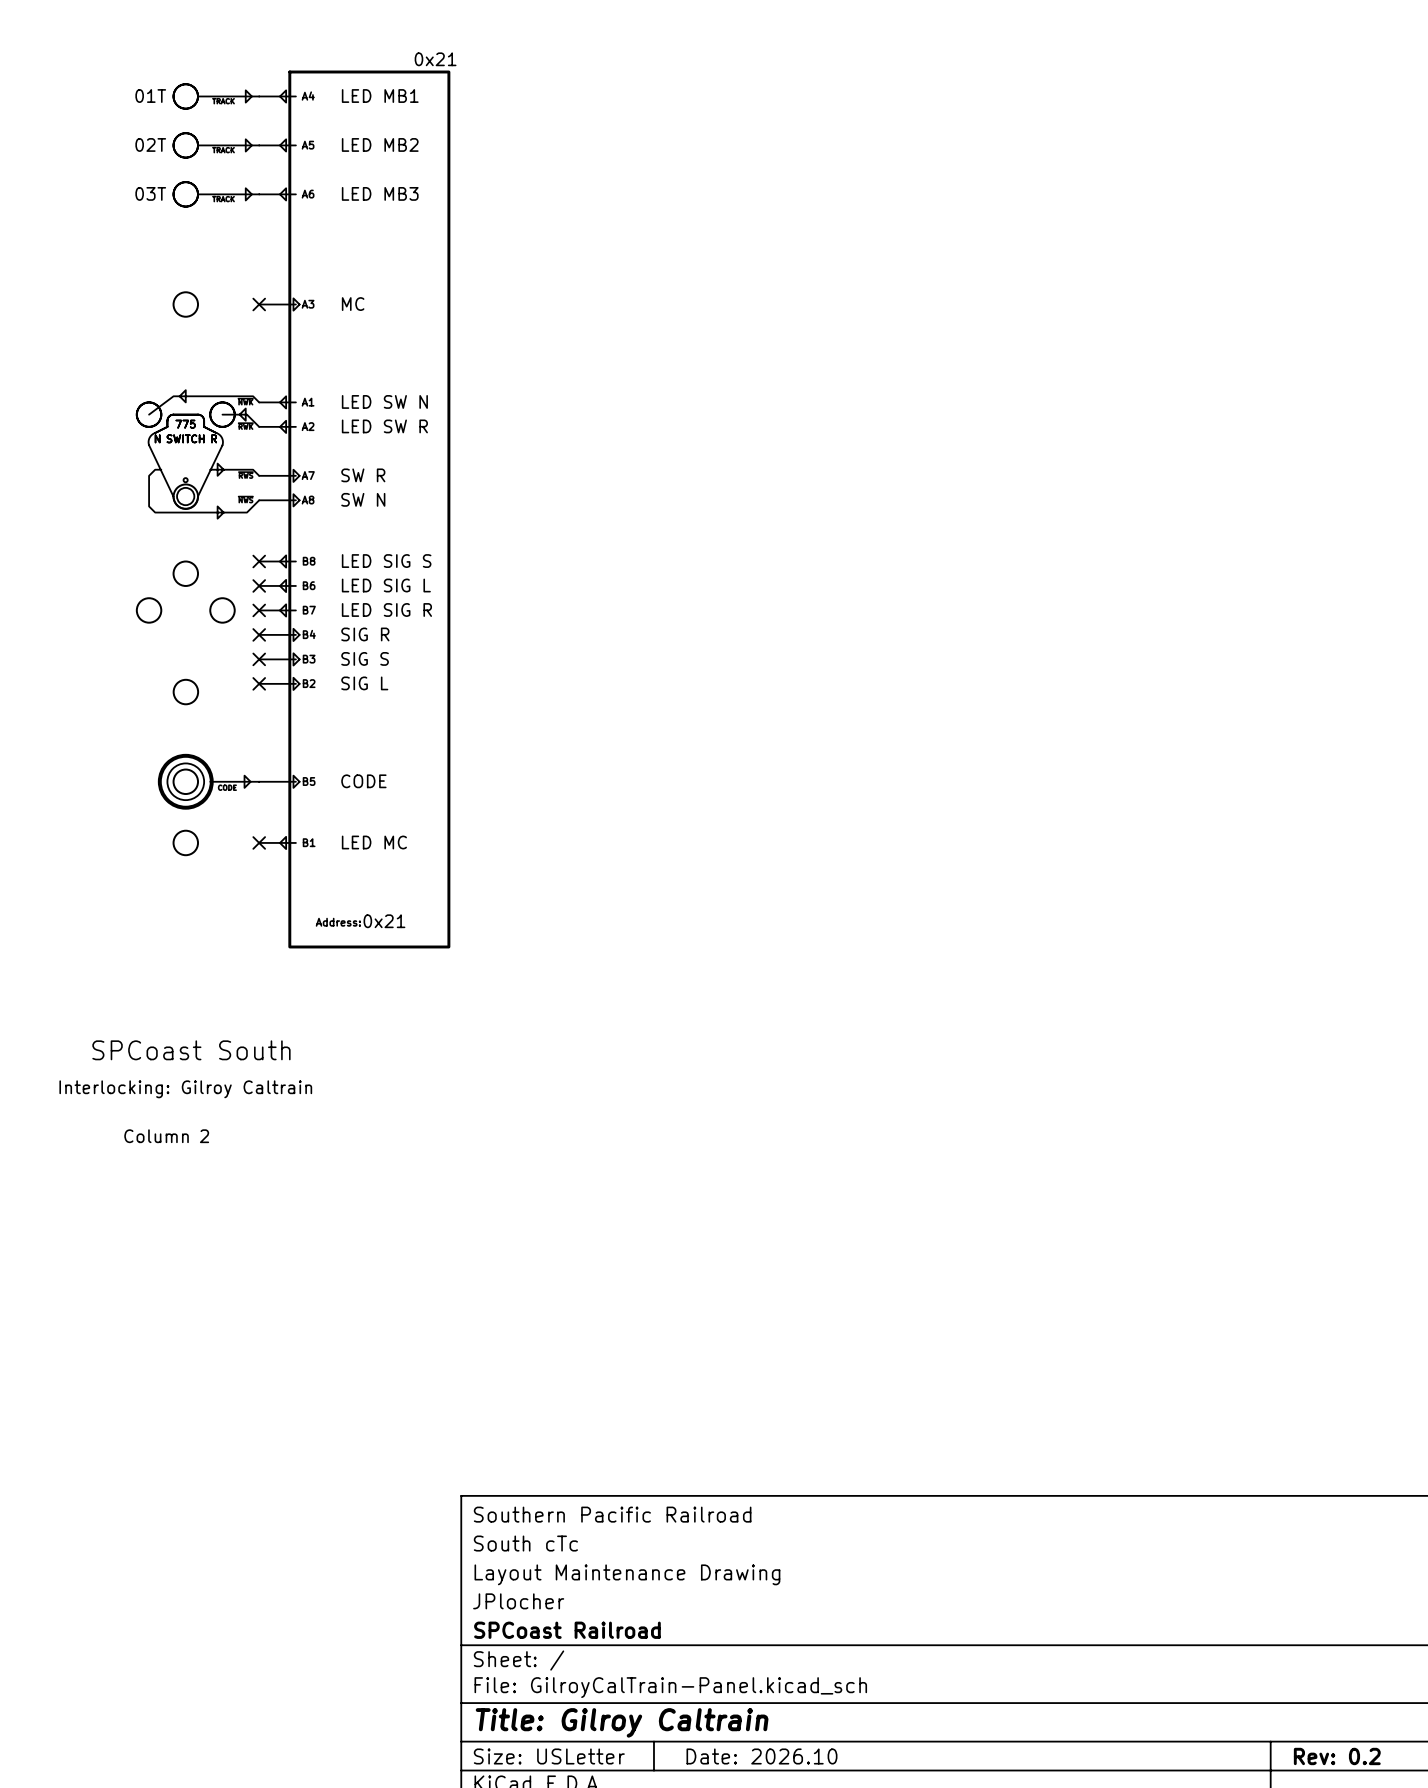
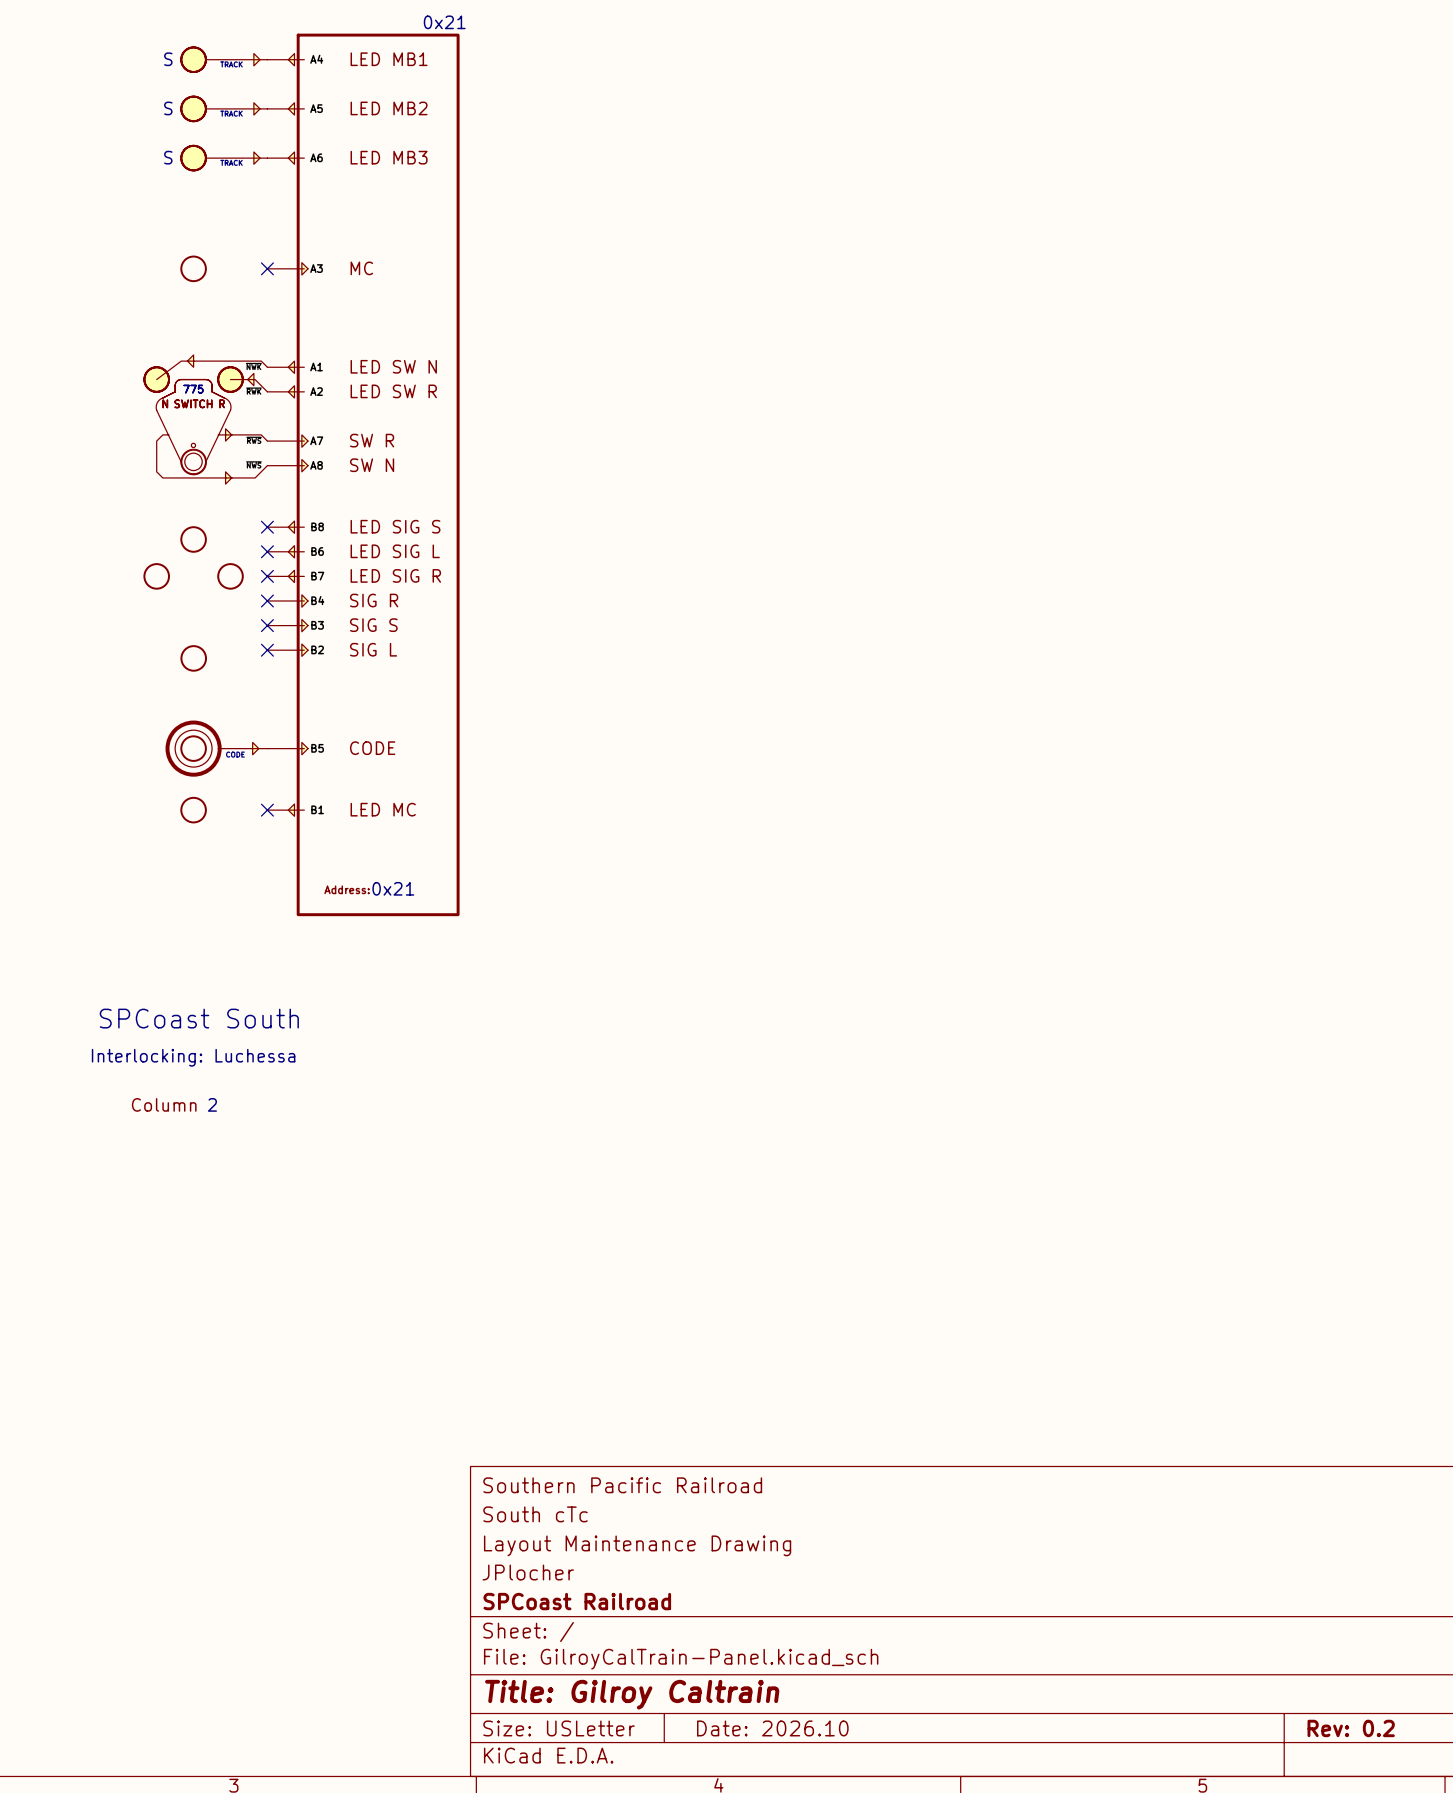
part text: 01T (150, 96) -> S (168, 59)
part text: 02T (150, 144) -> S (168, 108)
part text: 03T (150, 193) -> S (168, 157)
part text: Interlocking: Gilroy Caltrain (185, 1089) -> Interlocking: Luchessa (193, 1057)

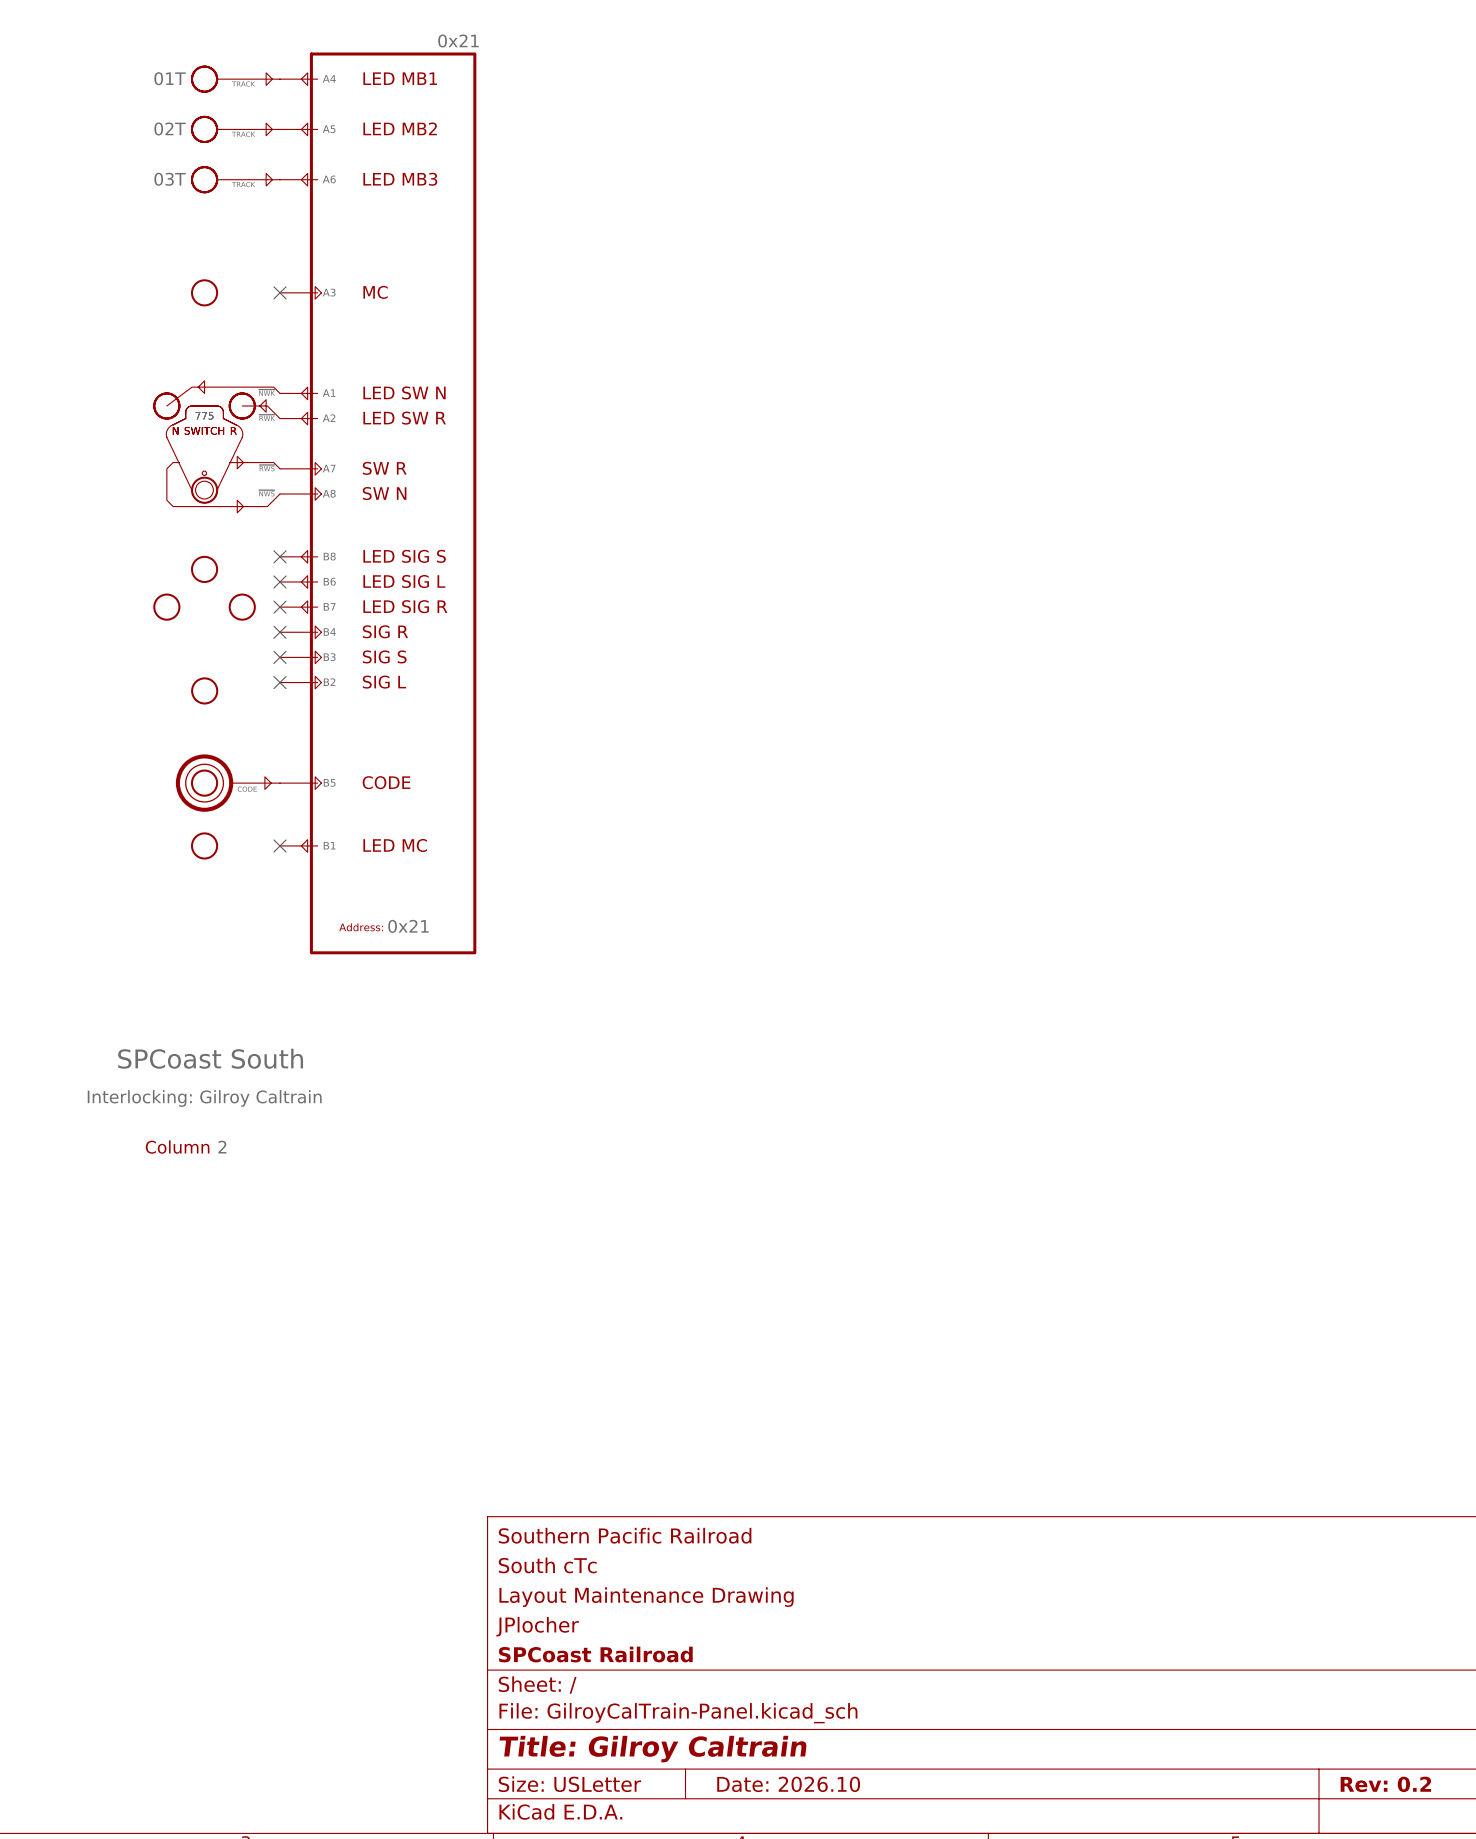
part text: S (168, 59) -> 01T (170, 78)
part text: S (168, 108) -> 02T (170, 128)
part text: S (168, 157) -> 03T (170, 179)
part text: Interlocking: Luchessa (193, 1057) -> Interlocking: Gilroy Caltrain (204, 1098)

